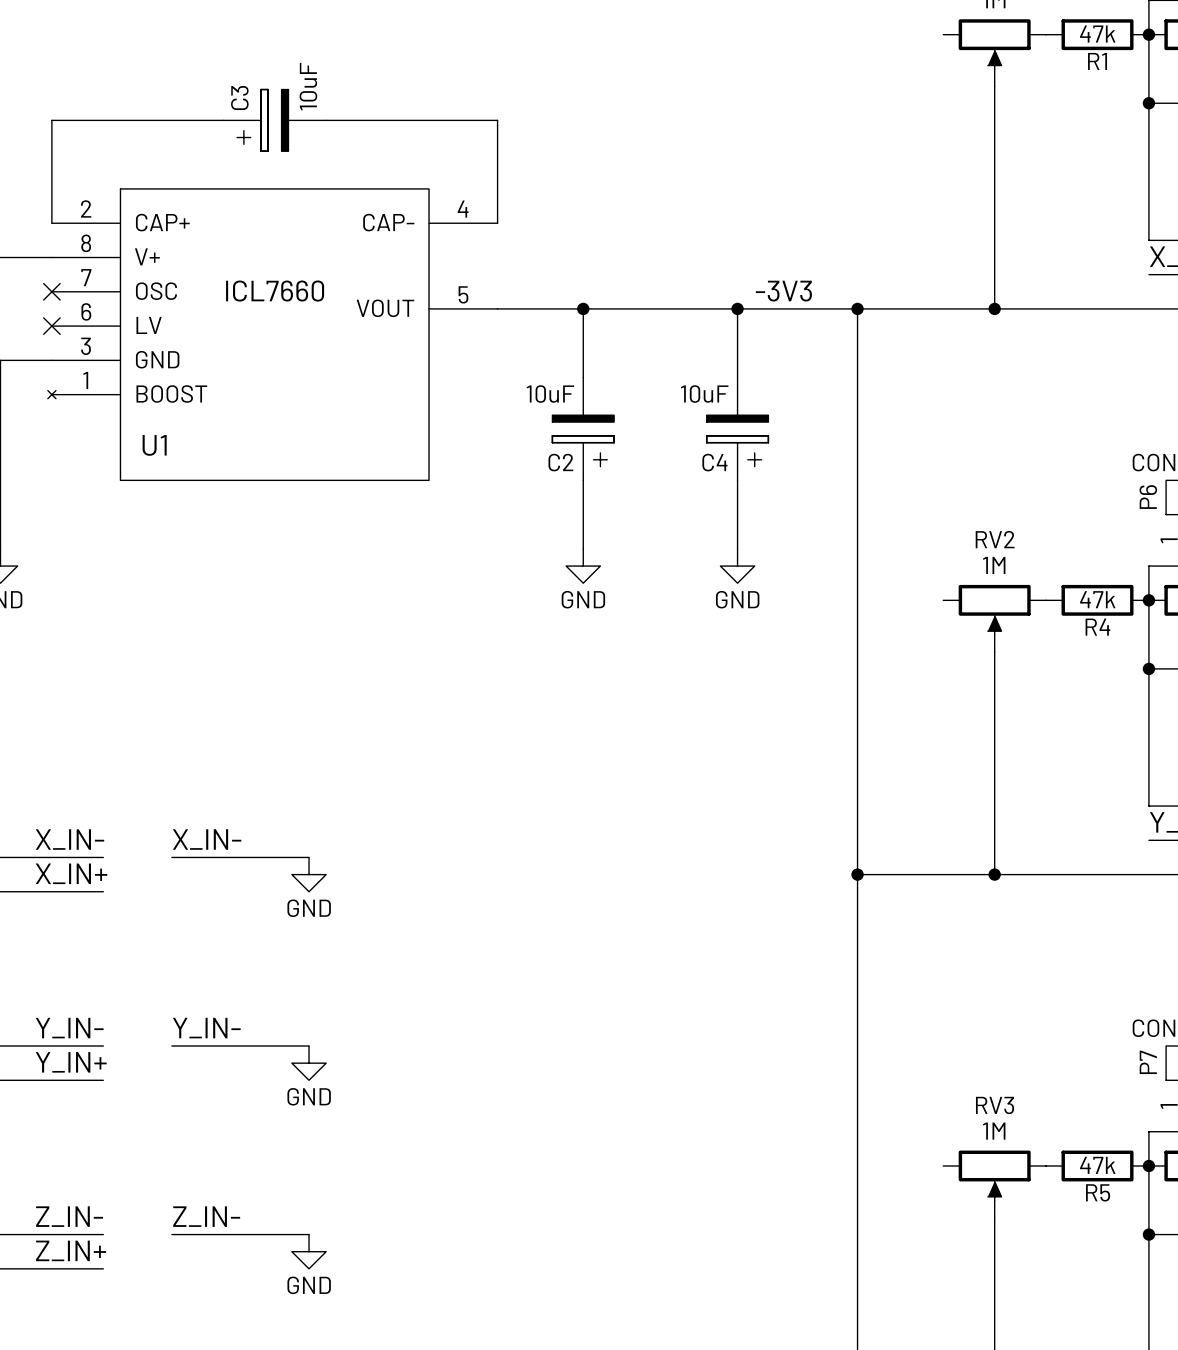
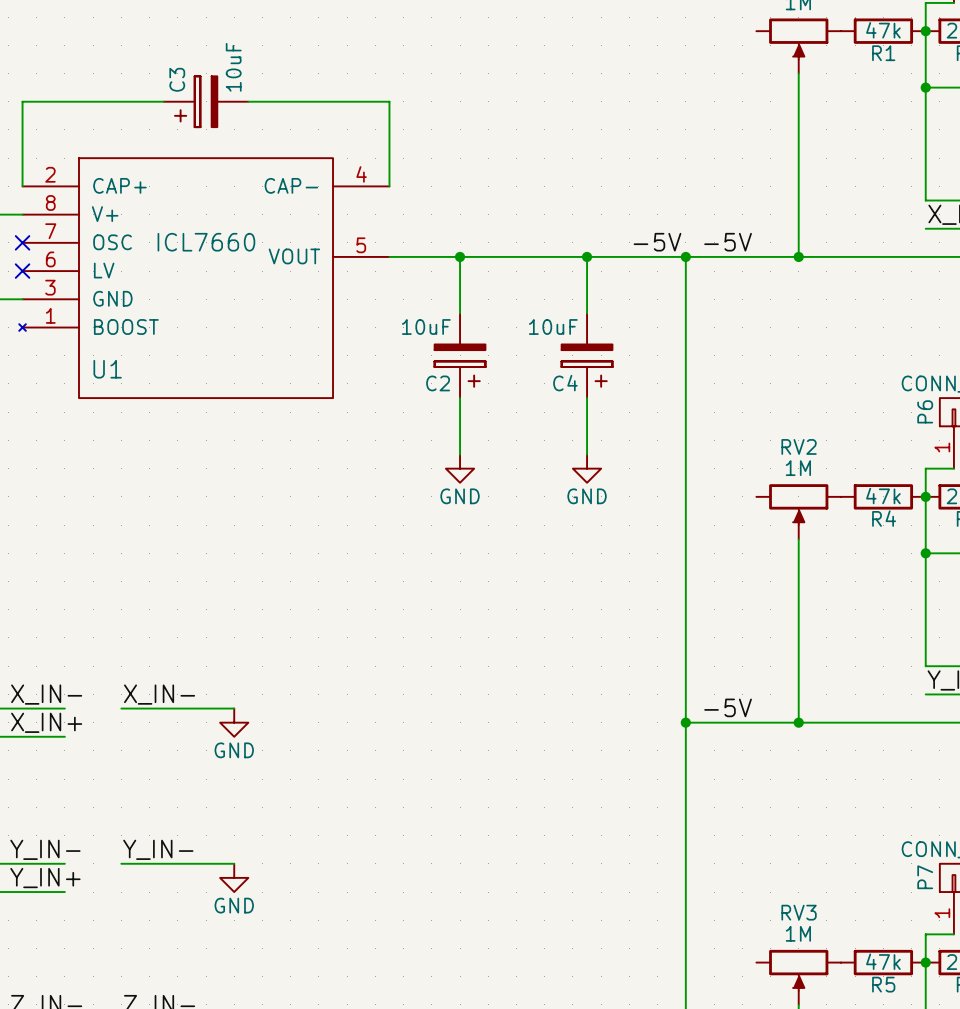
label: -3V3 (783, 291) -> none
label: none -> -5V (657, 242)
label: none -> -5V (728, 242)
label: none -> -5V (728, 707)

